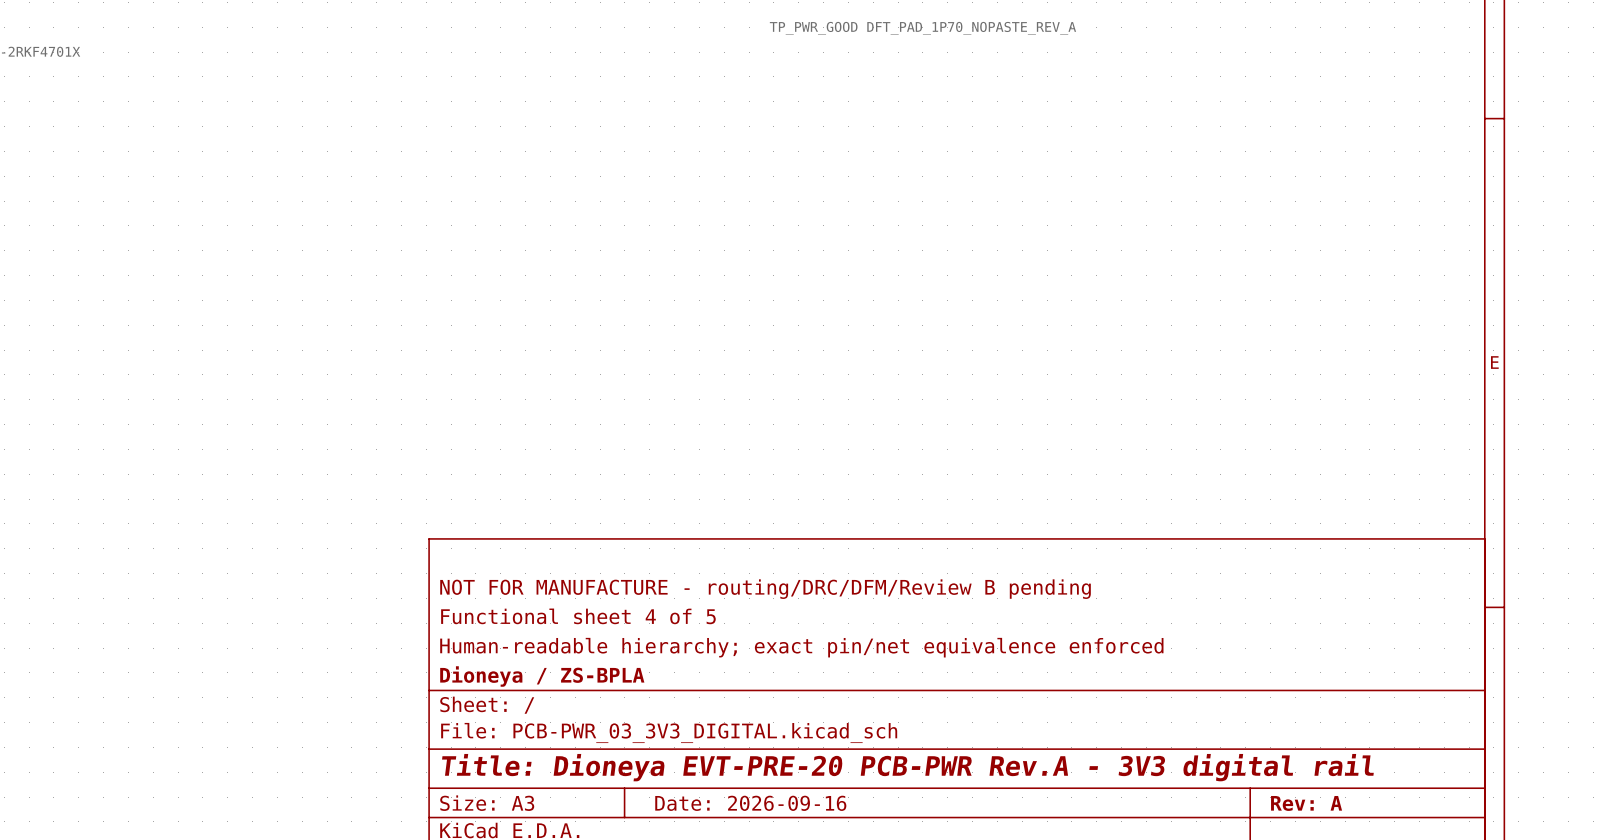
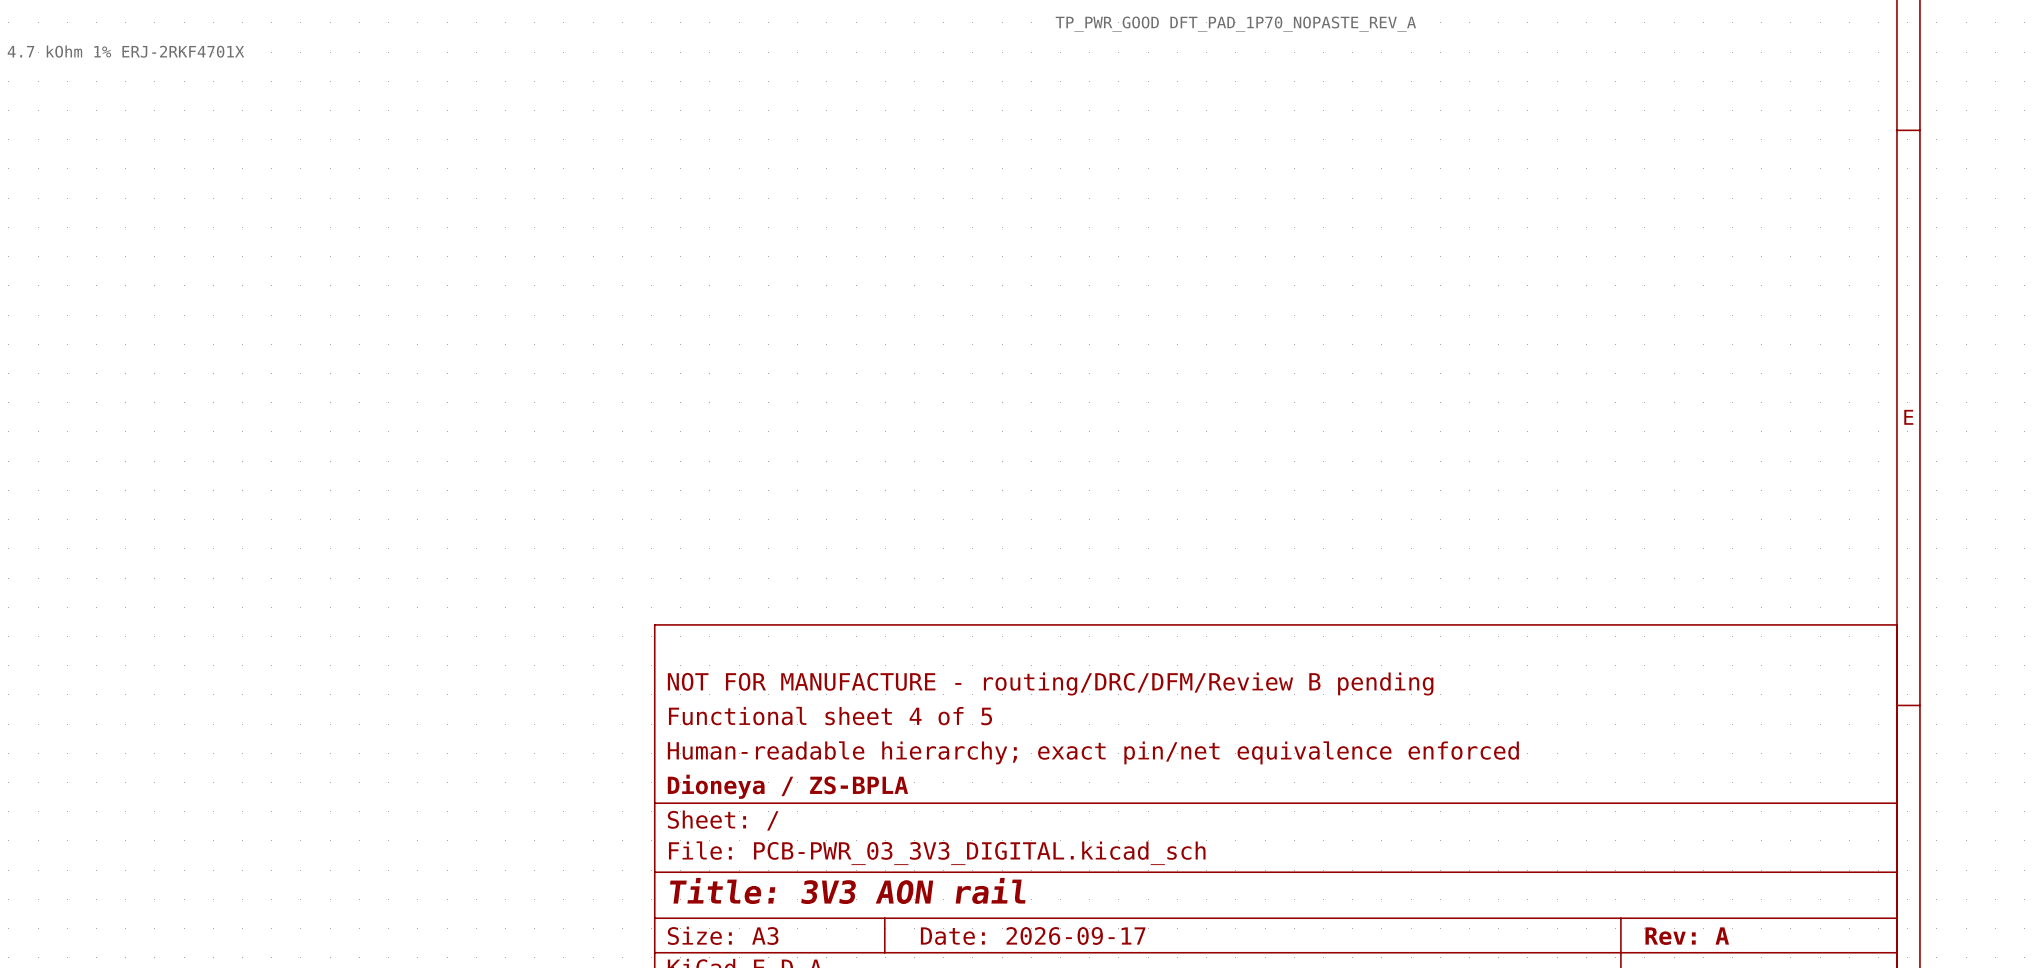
title block: Title: Dioneya EVT-PRE-20 PCB-PWR Rev.A - 3V3 digital rail (907, 767) -> Title: 3V3 AON rail (847, 890)
title block: Date: 2026-09-16 (750, 803) -> Date: 2026-09-17 (1033, 936)

